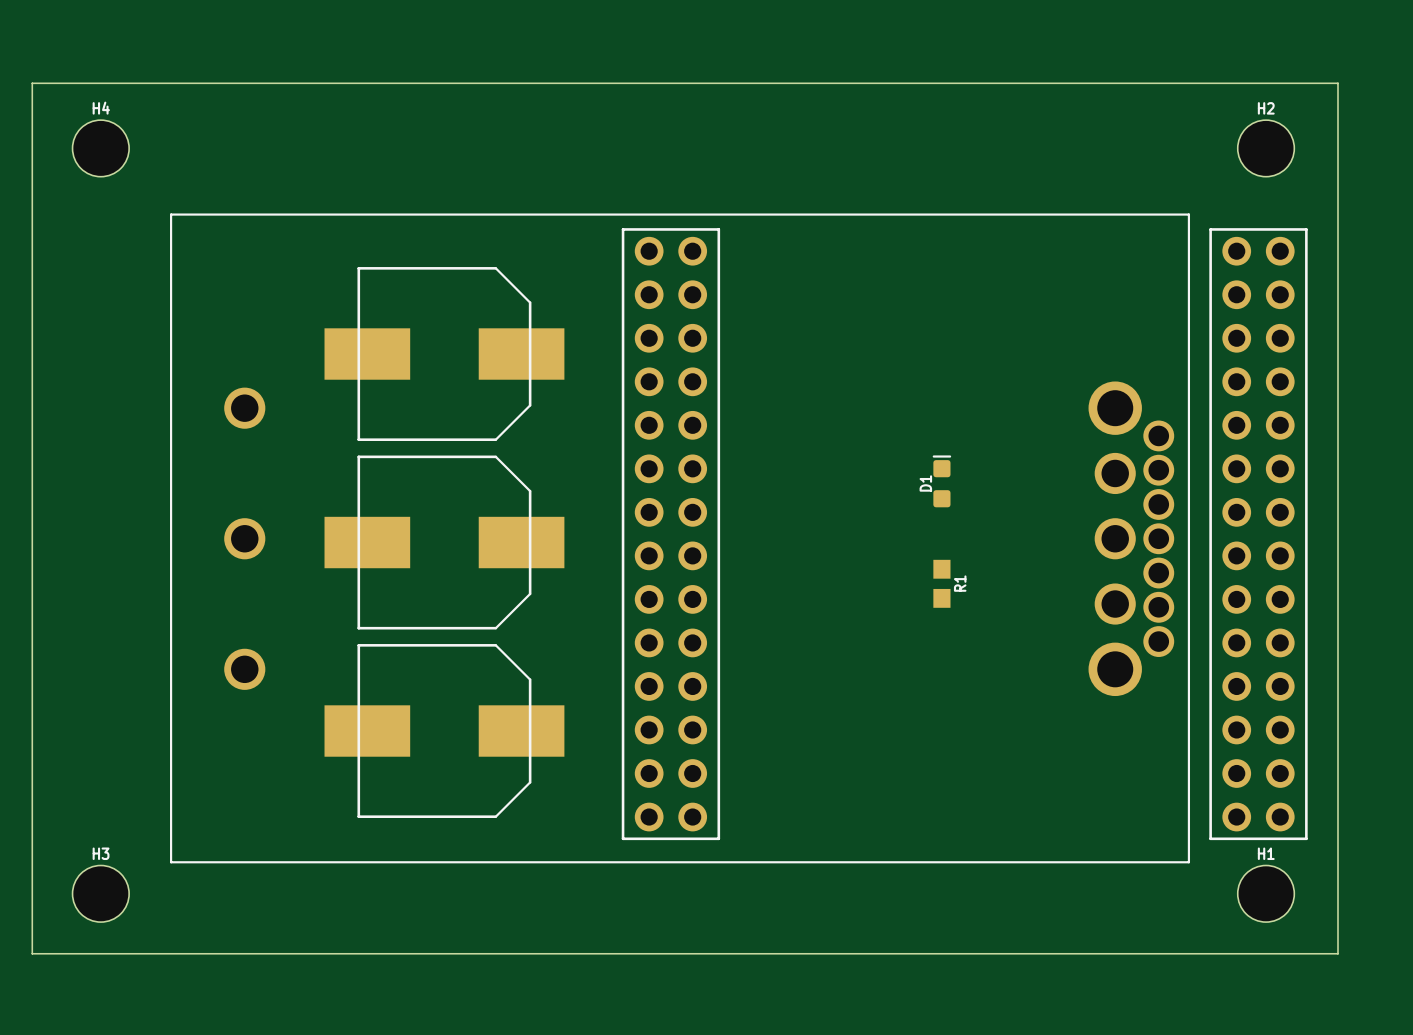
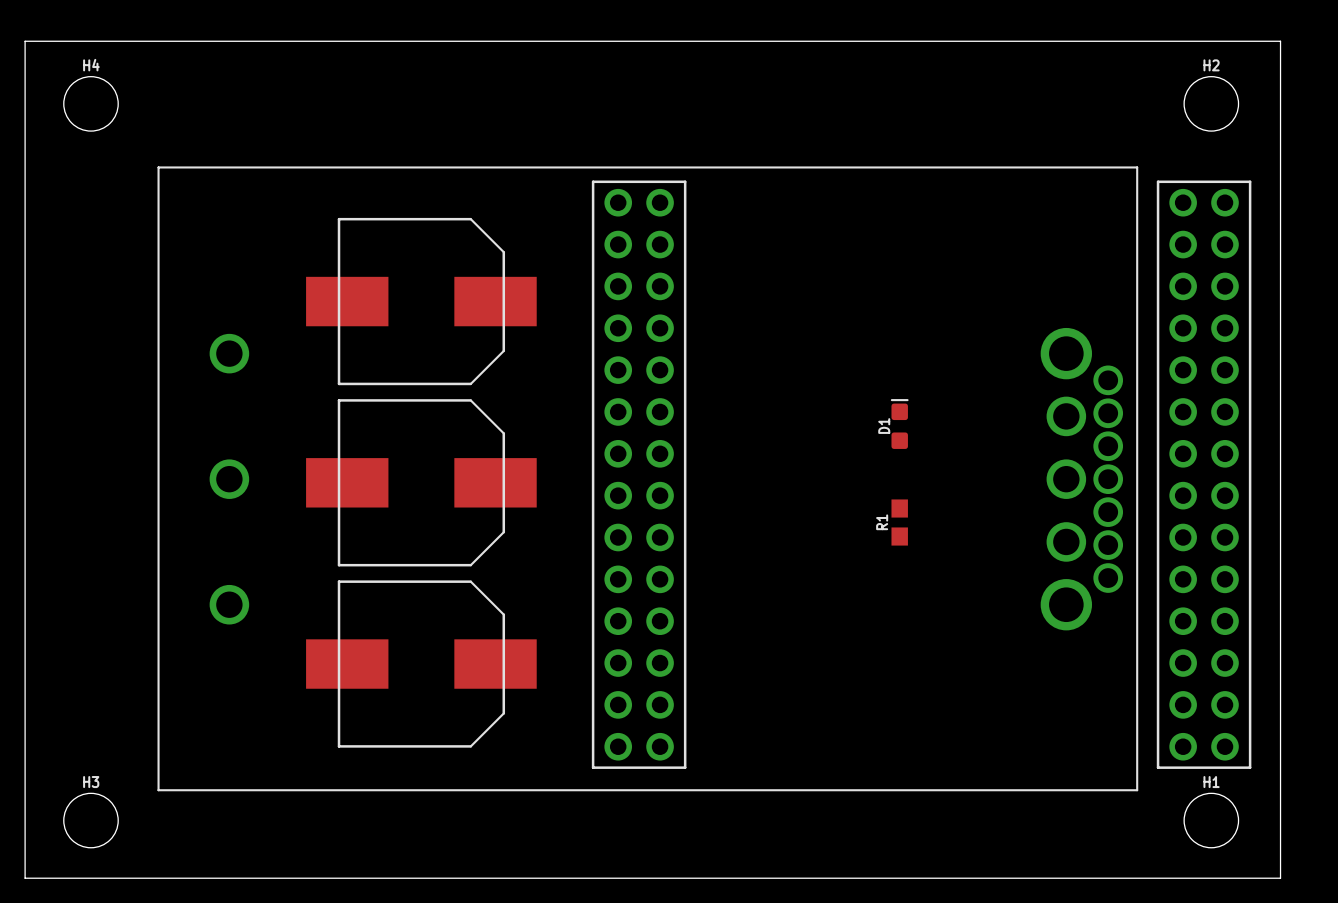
R1 name position: R1 (960, 583) -> R1 (882, 522)

